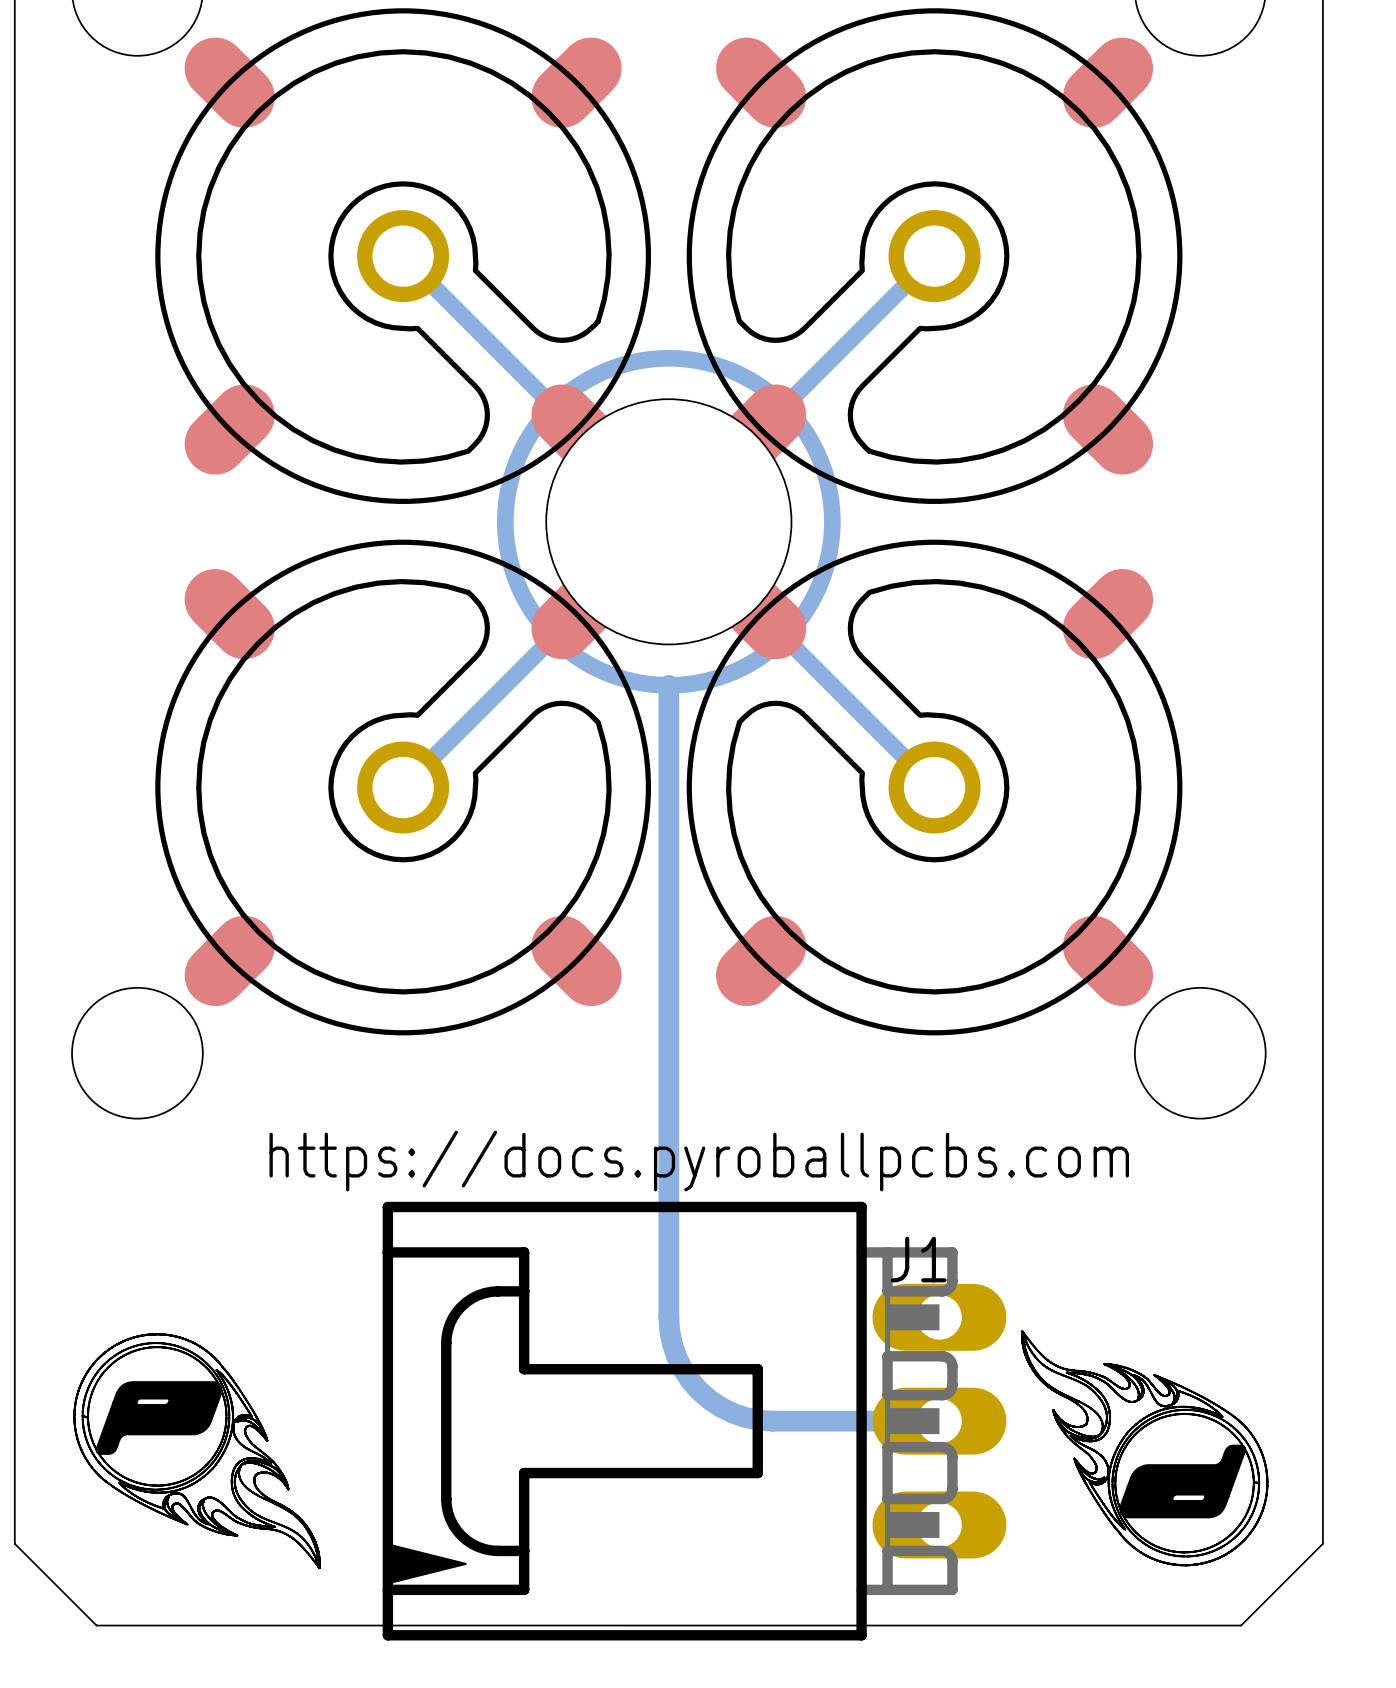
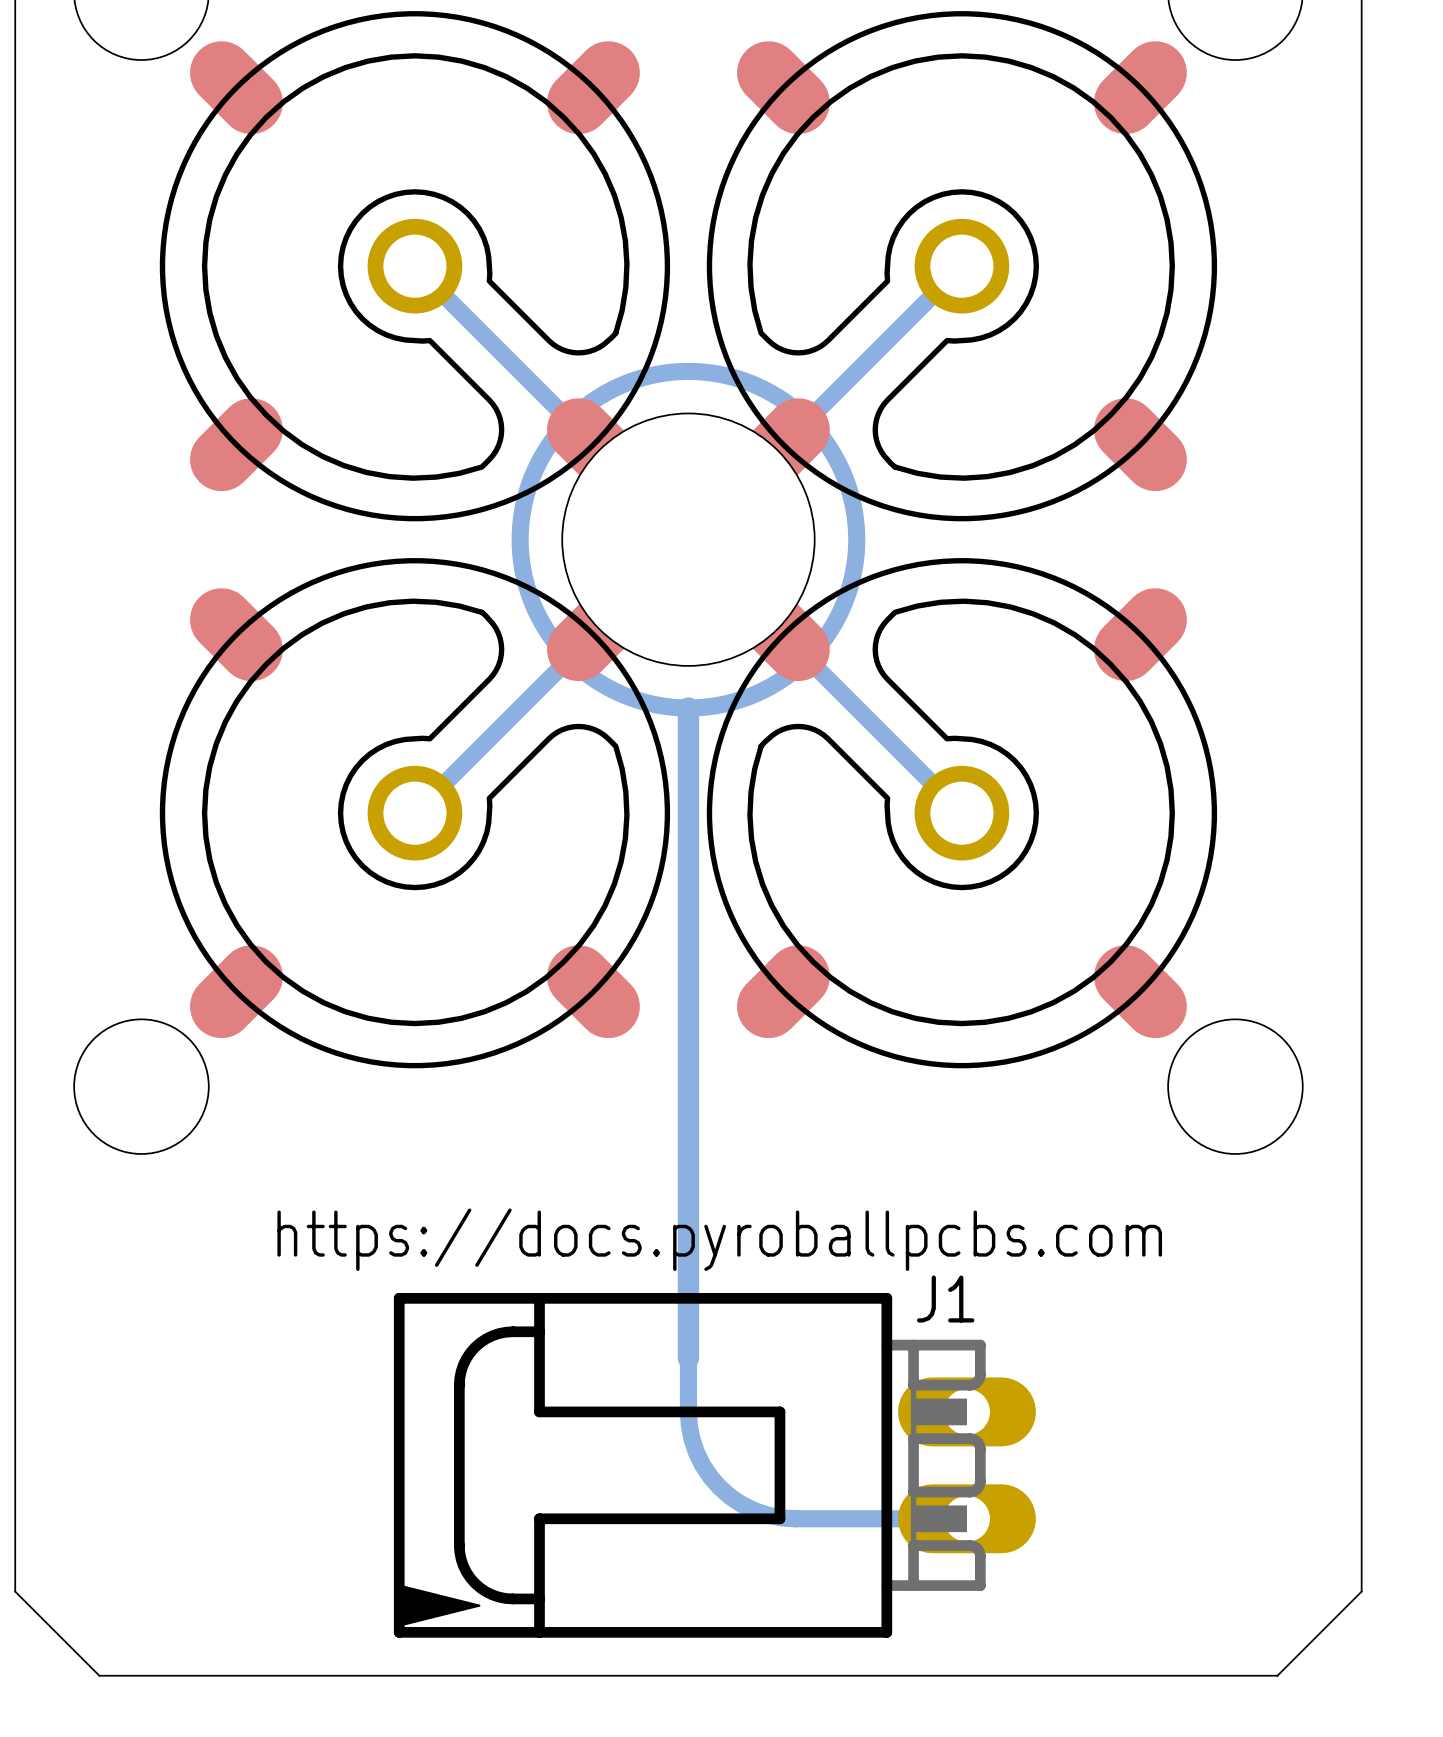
text position: https://docs.pyroballpcbs.com (699, 1161) -> https://docs.pyroballpcbs.com (719, 1239)
J1 footprint: [382, 1201, 1007, 1641] -> [393, 1293, 1036, 1638]
bottom track: (668, 1317) (672, 1344) (676, 1357) (690, 1380) (709, 1399) (732, 1413) (759, 1420) (772, 1421) (939, 1421) -> (688, 1358) (689, 1425) (696, 1452) (710, 1476) (719, 1487) (741, 1504) (767, 1515) (795, 1518) (966, 1518)
drawing: [1021, 1330, 1269, 1567] -> none
drawing: [73, 1333, 321, 1570] -> none

